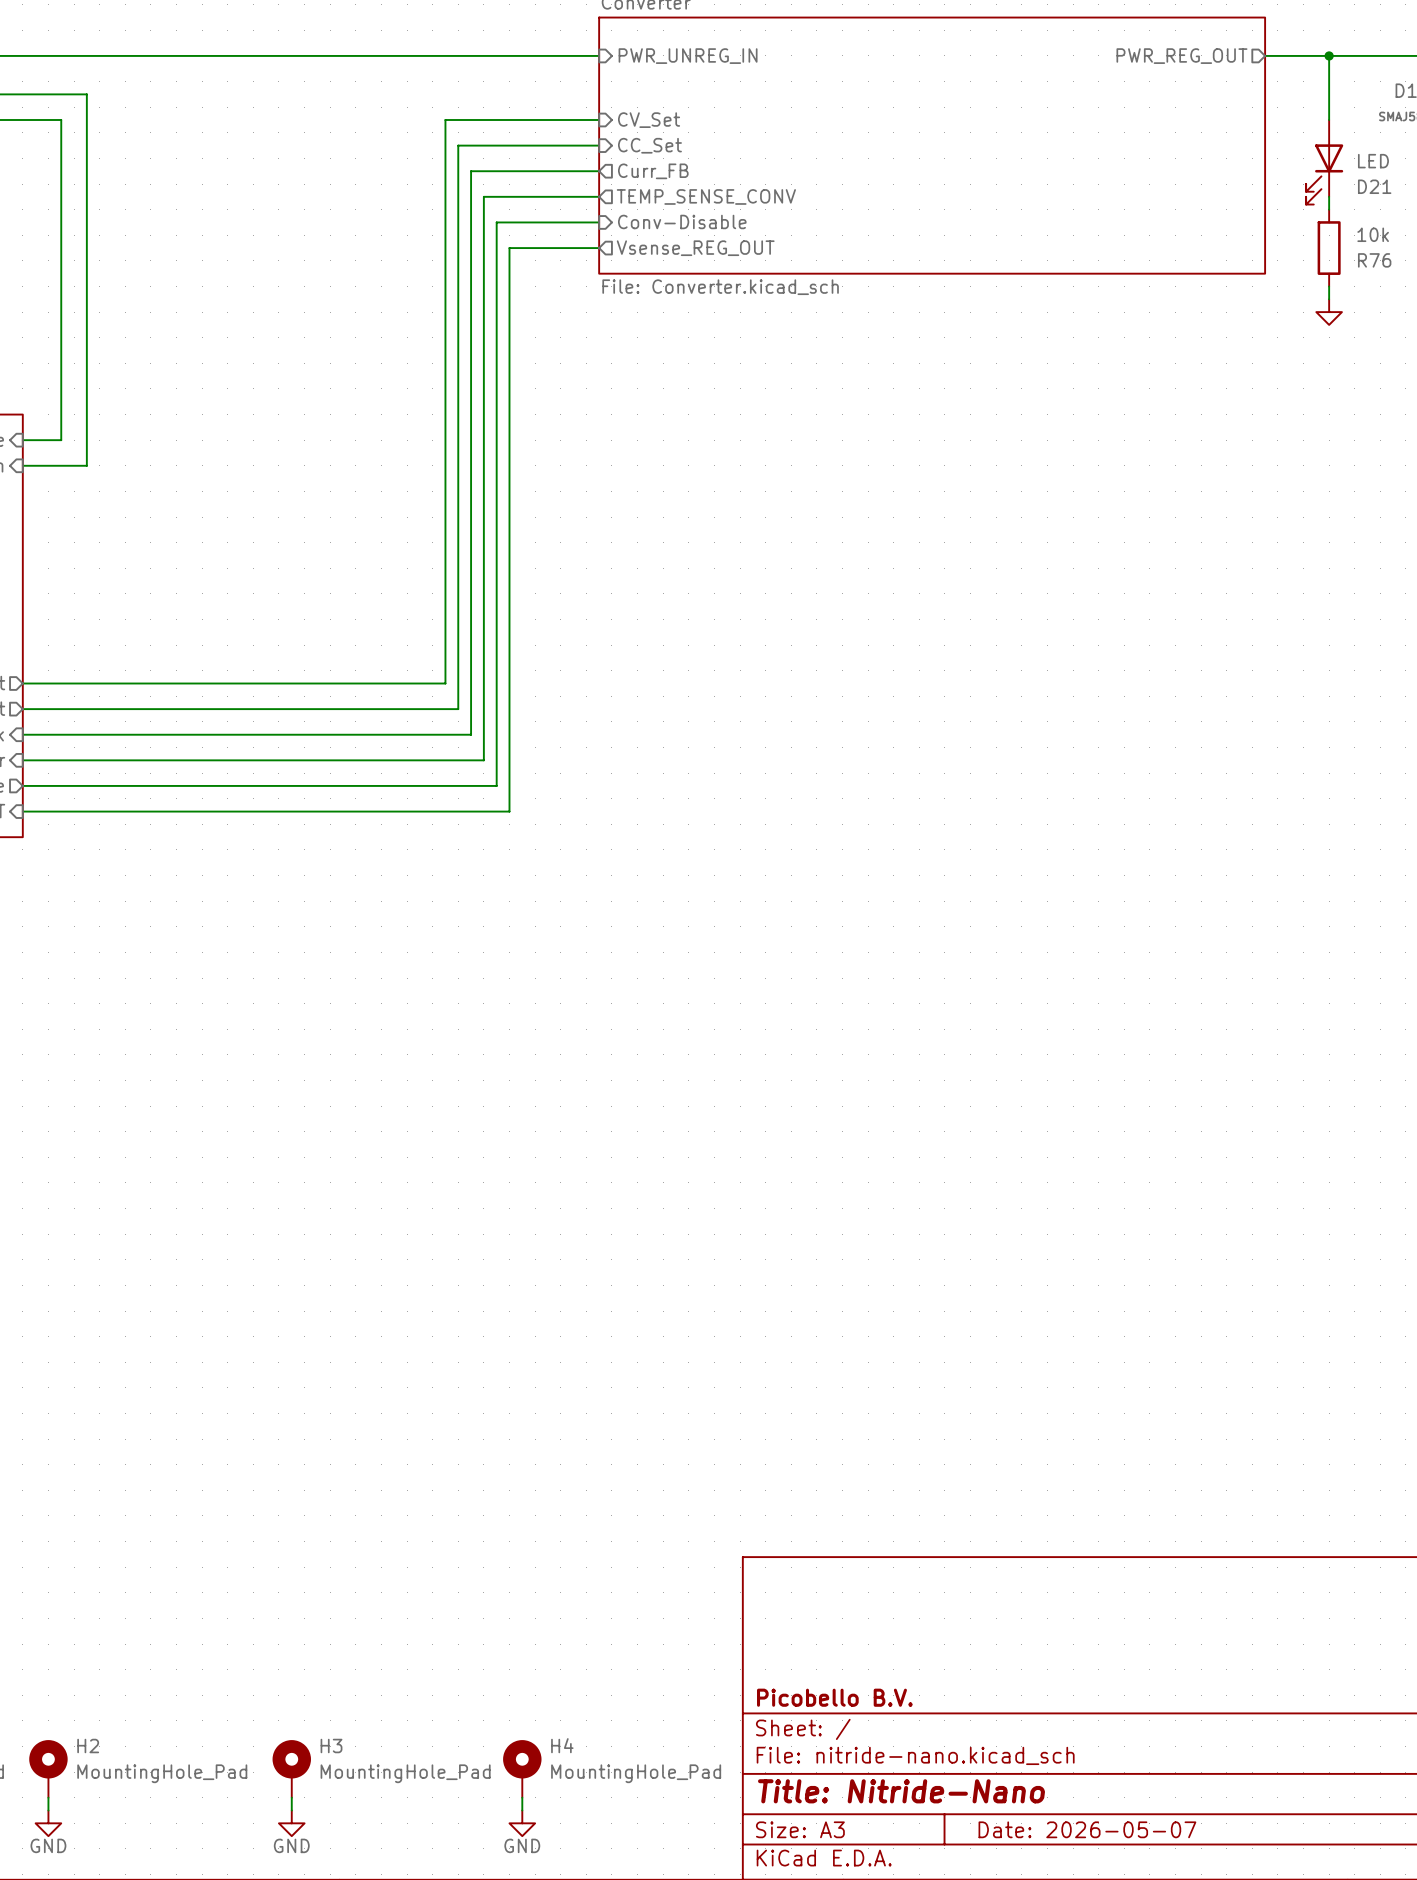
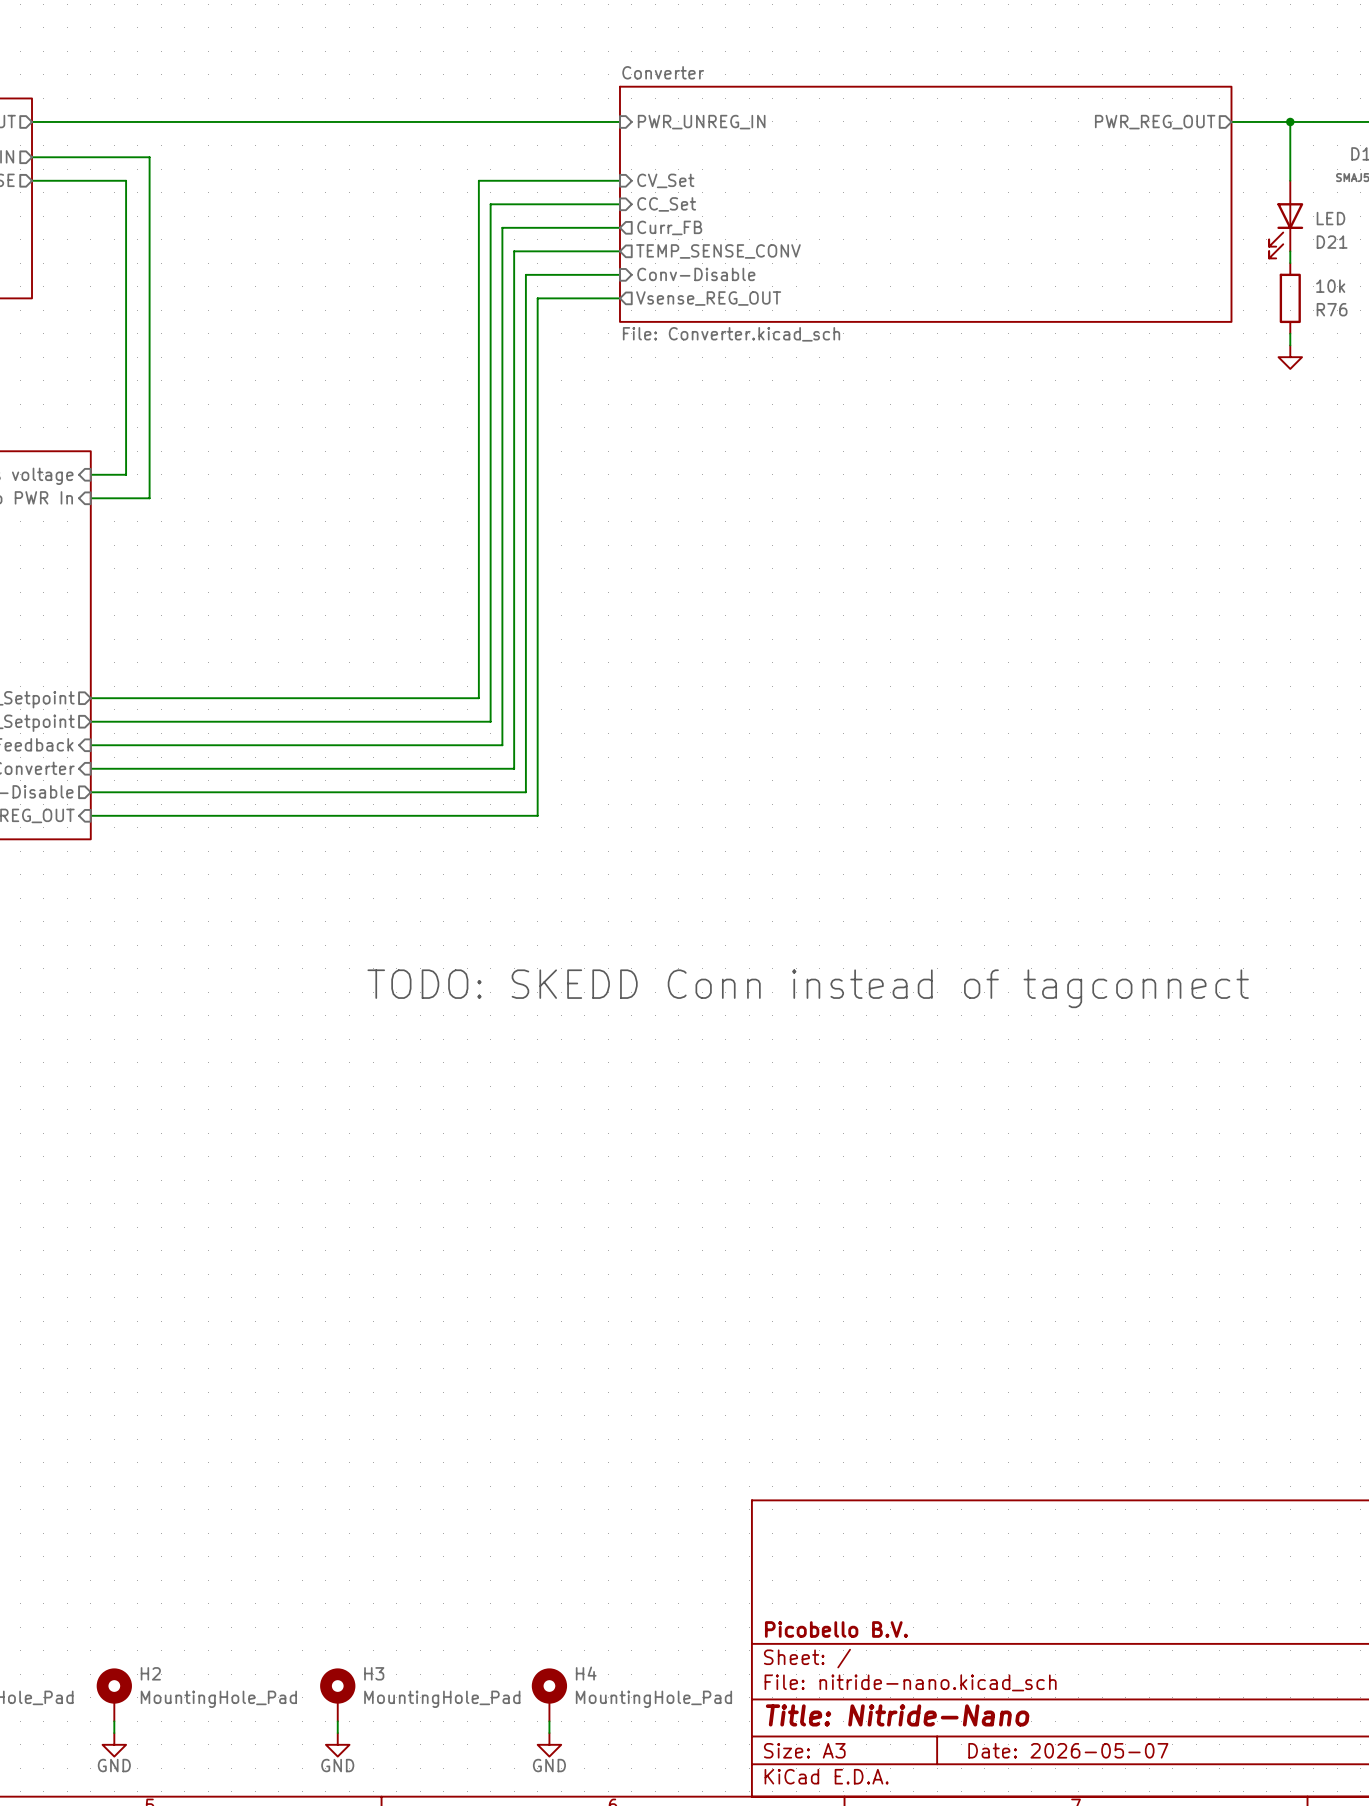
text: none -> TODO: SKEDD Conn instead of tagconnect (808, 988)

